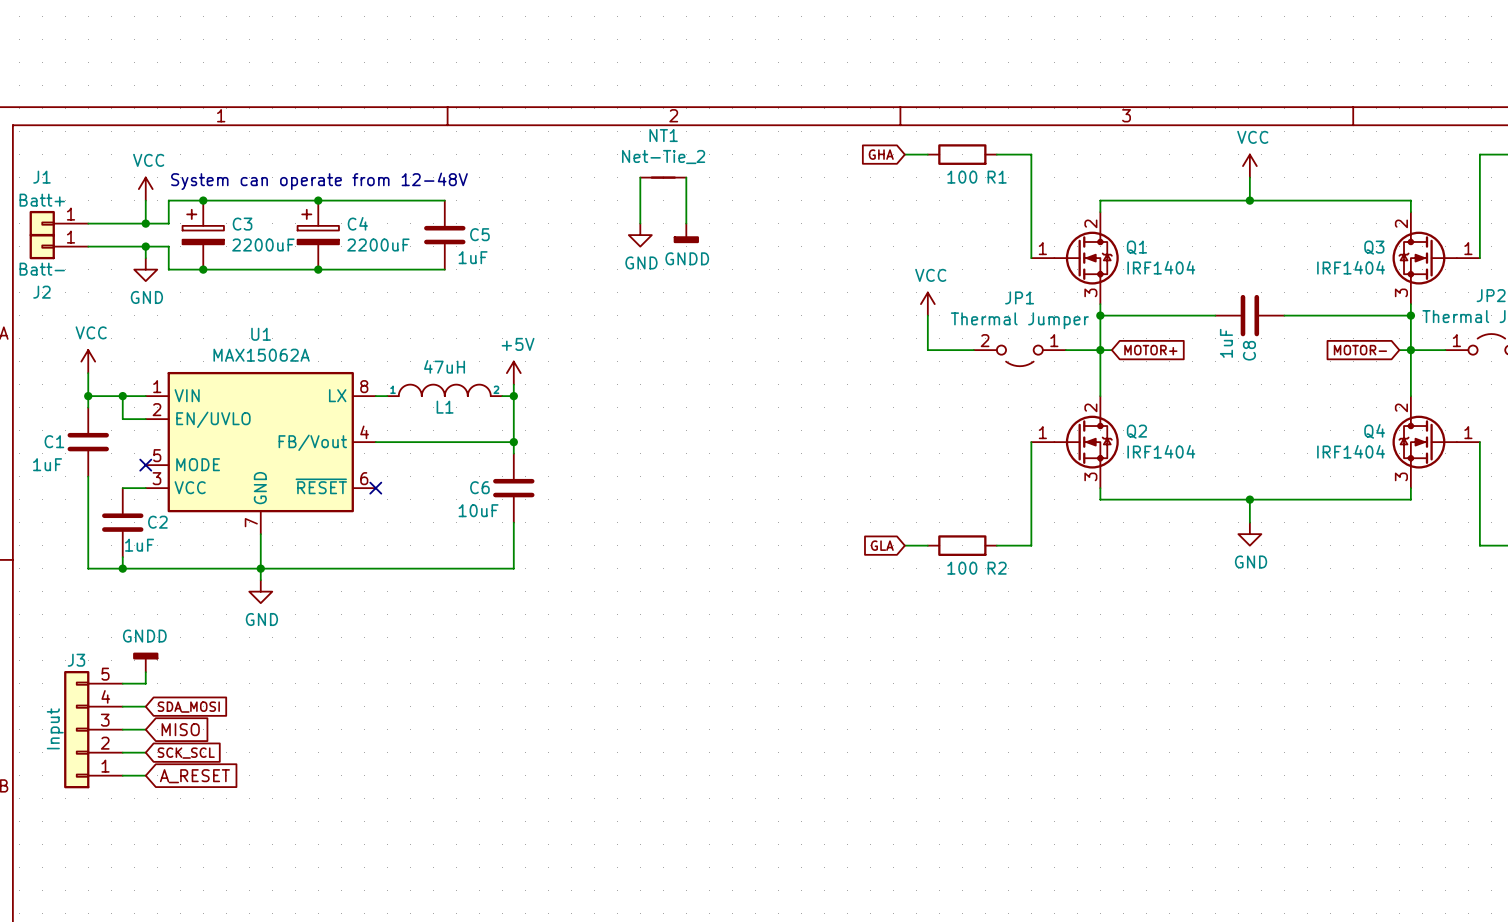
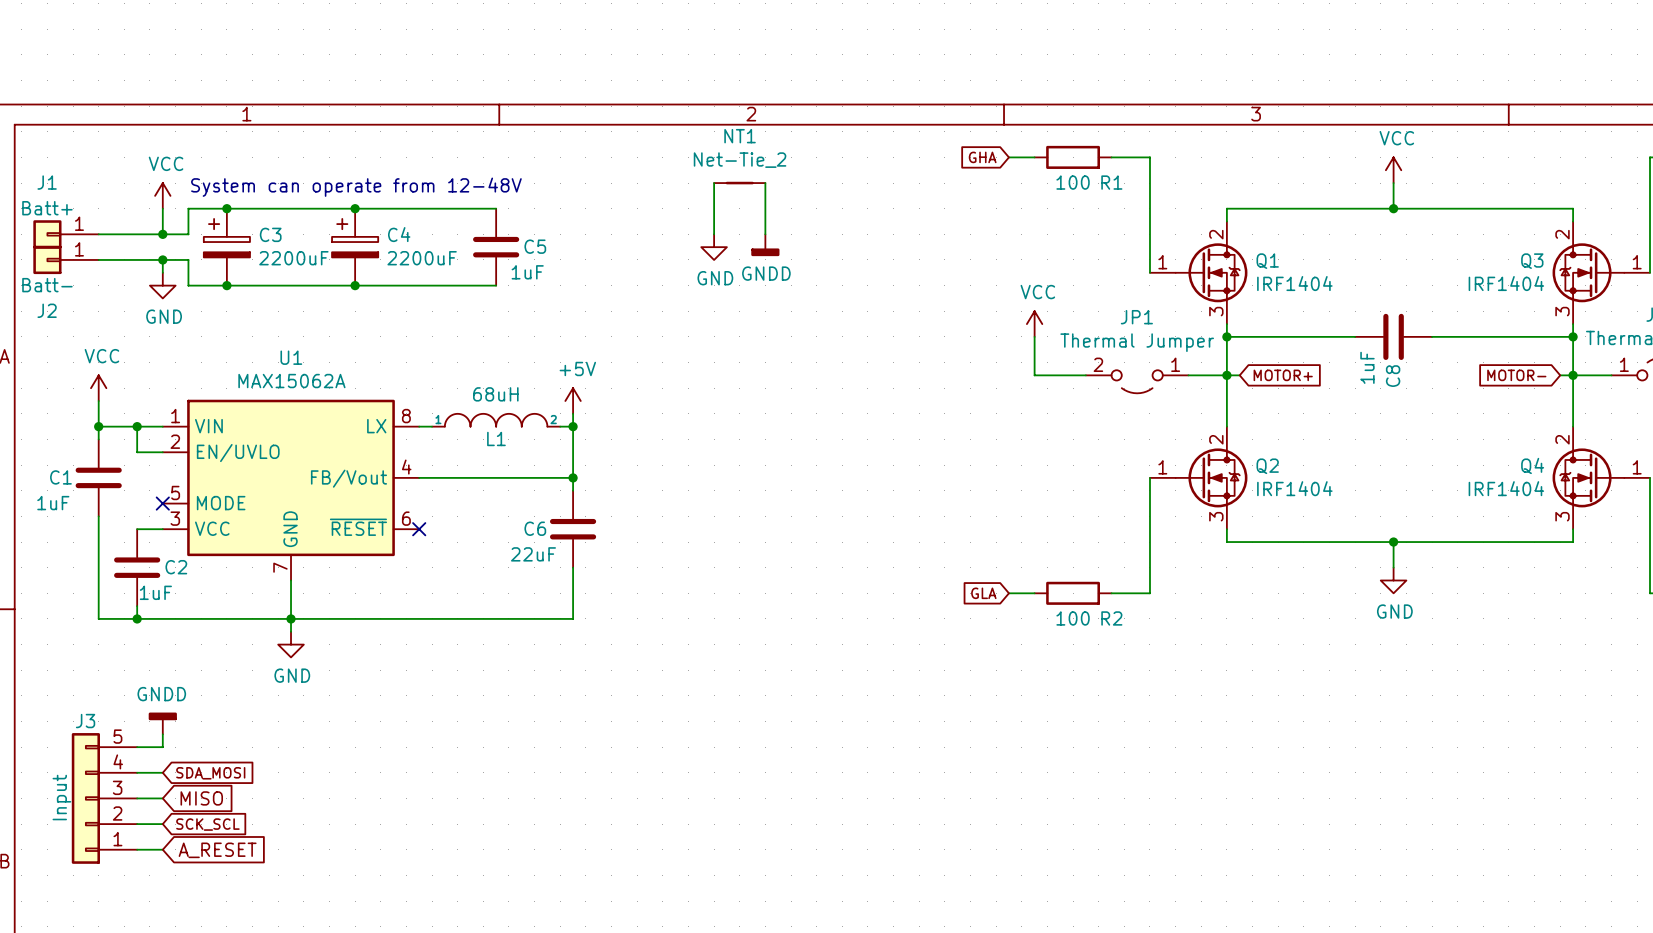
L1 value: 47uH (444, 366) -> 68uH (495, 394)
C6 value: 10uF (478, 510) -> 22uF (533, 554)

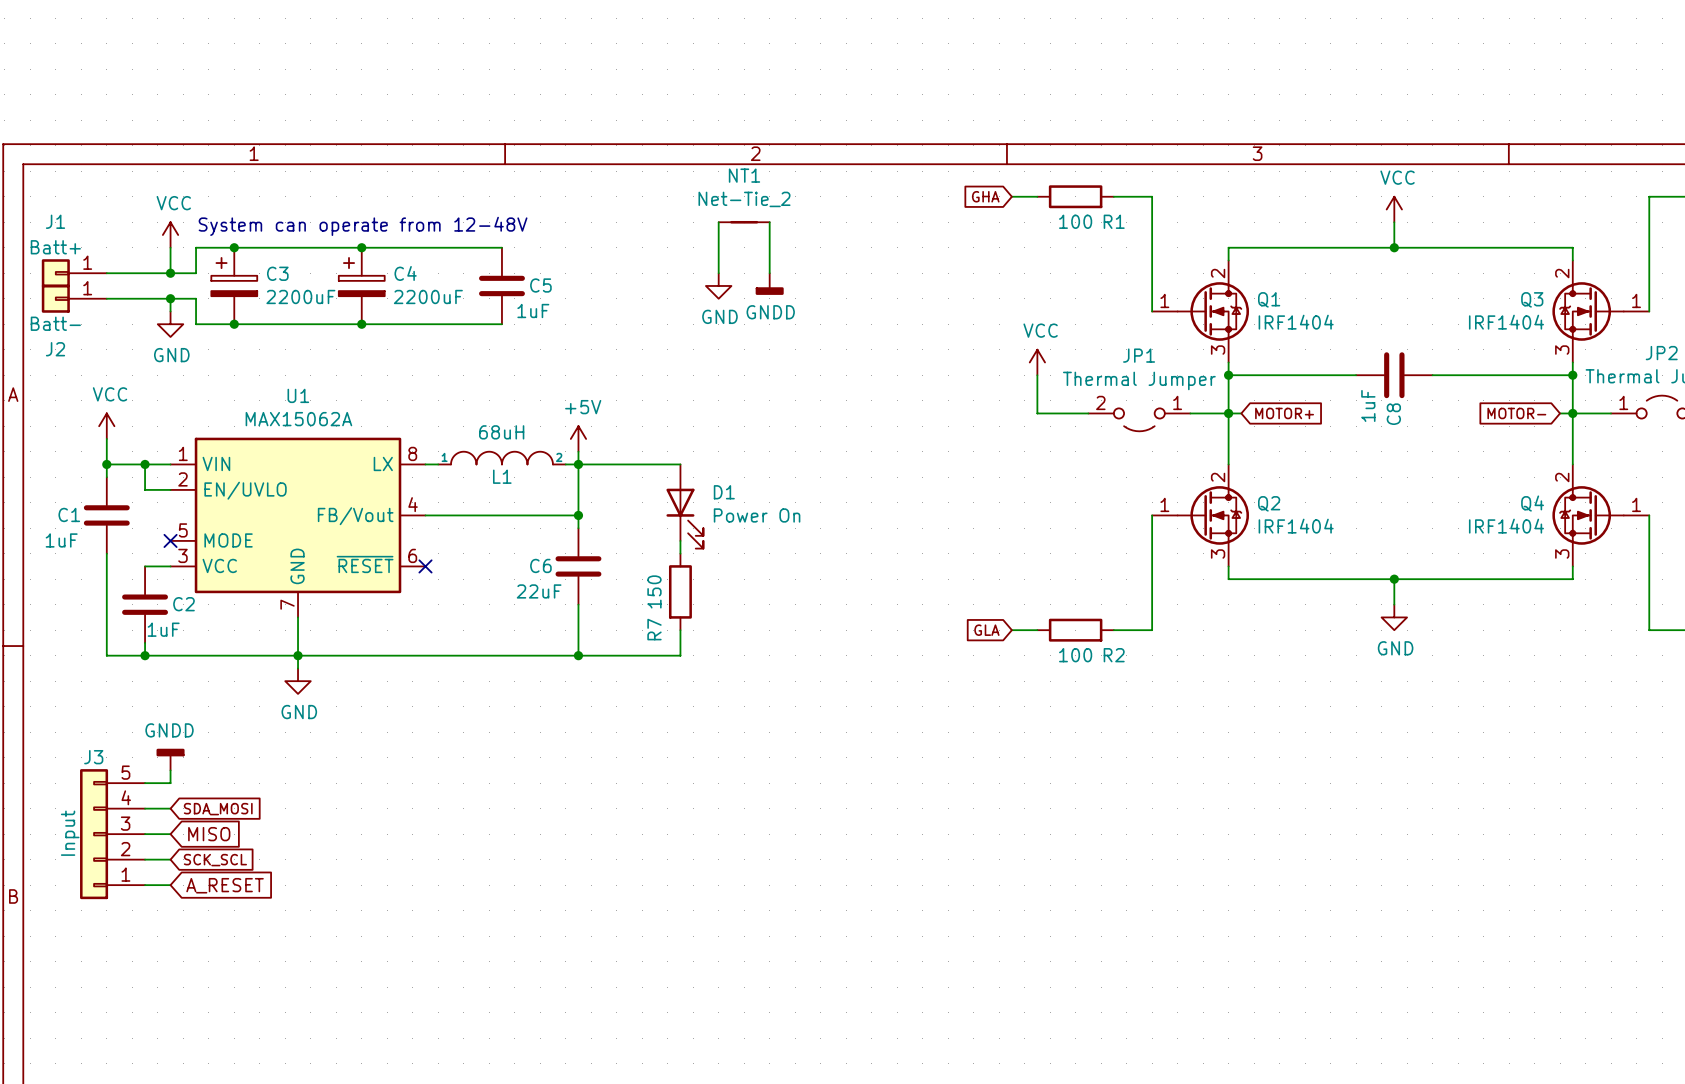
wire: none -> (578, 464) (680, 464)
D1: none -> Power On (684, 506)
wire: none -> (680, 540) (680, 553)
R7: none -> 150 (680, 591)
wire: none -> (680, 630) (680, 655) (578, 655)
junction: none -> (578, 655)

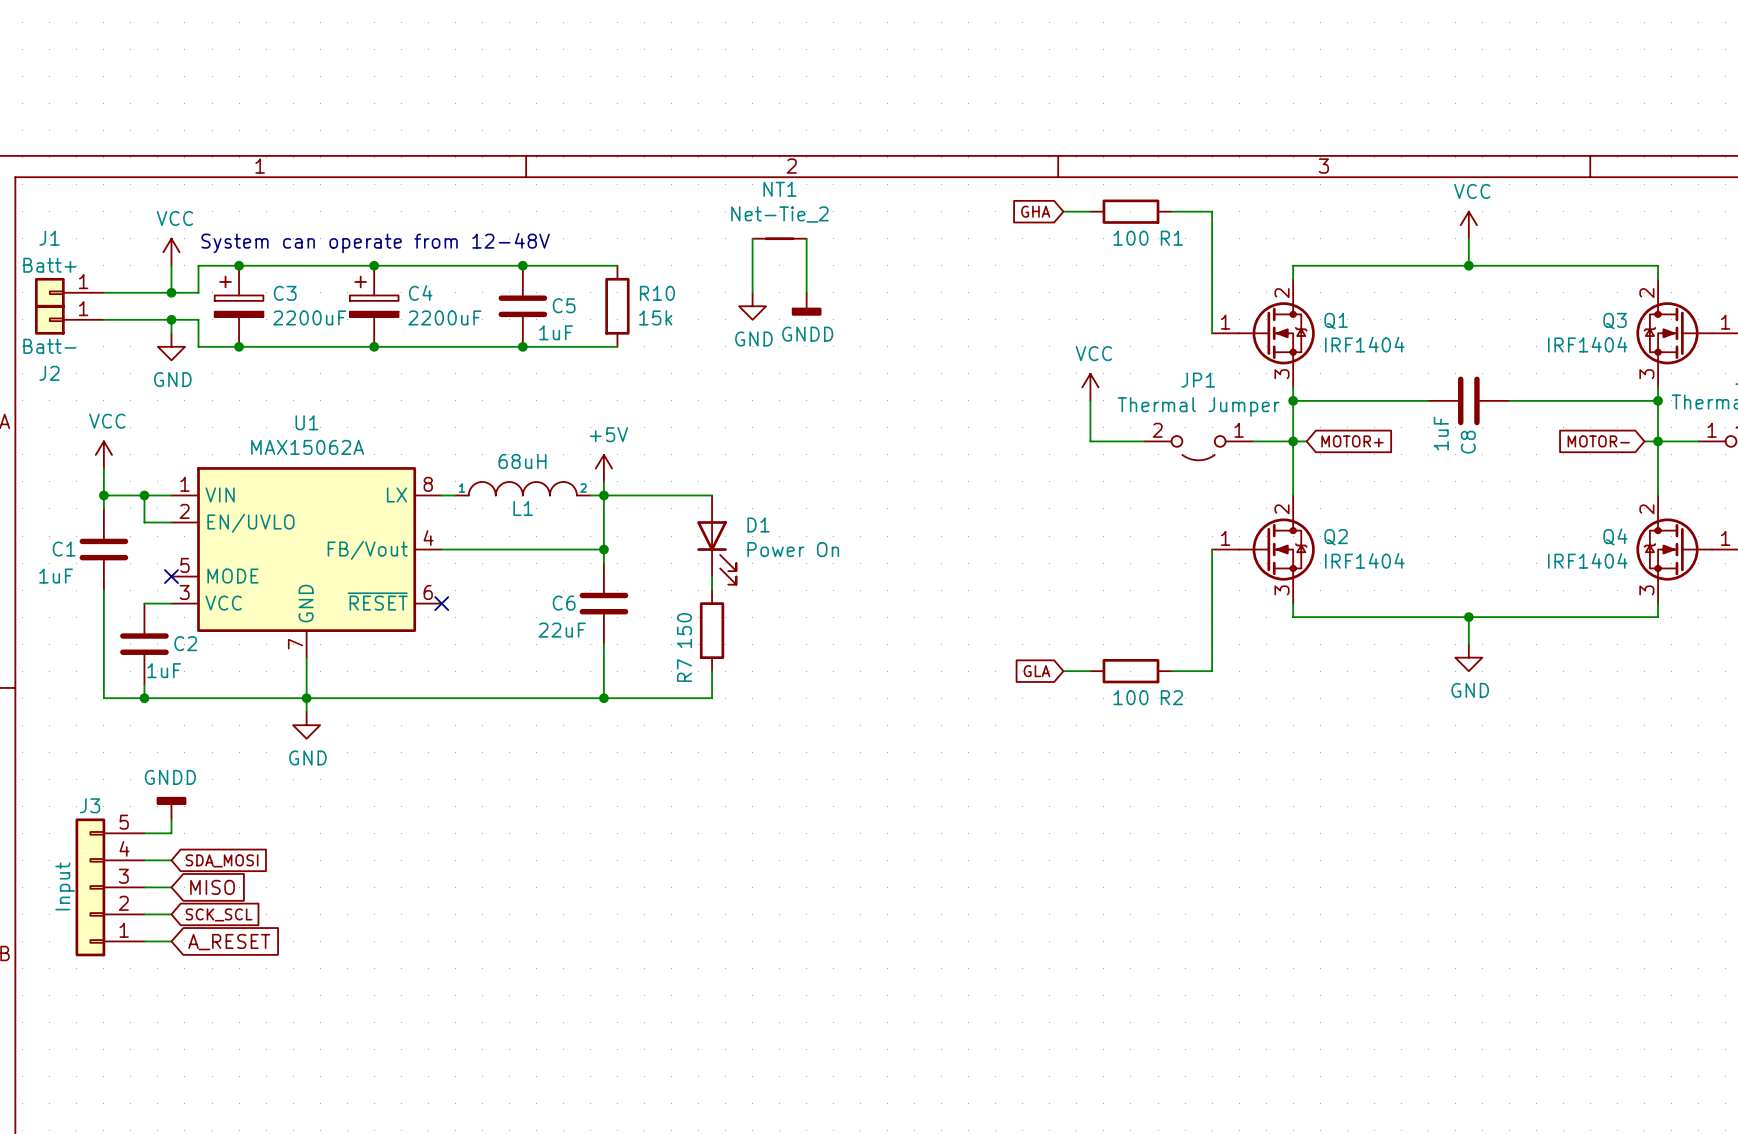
wire: none -> (522, 265) (617, 265)
junction: none -> (522, 265)
R10: none -> 15k (617, 306)
wire: none -> (522, 346) (617, 346)
junction: none -> (522, 346)

